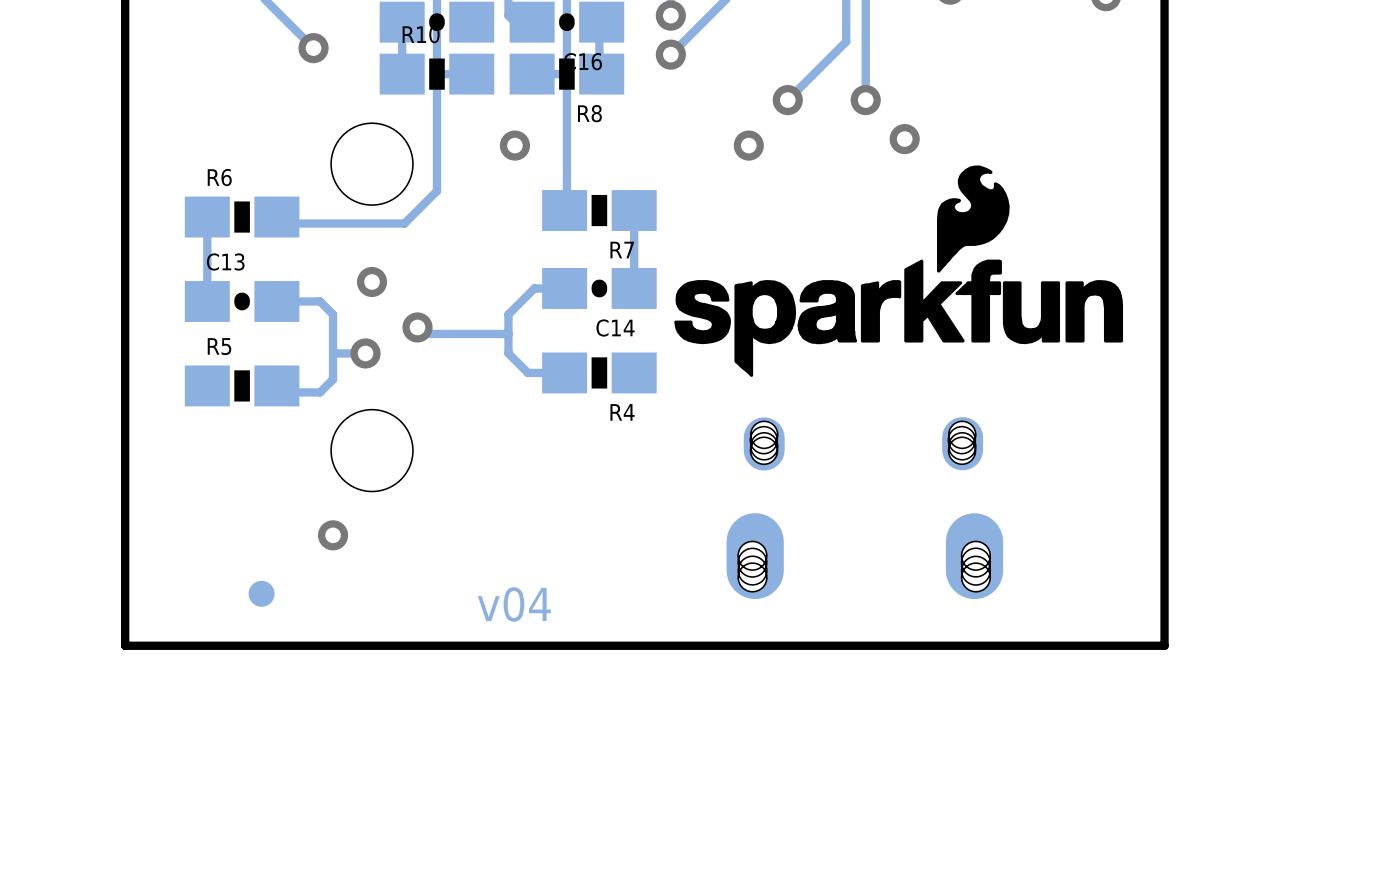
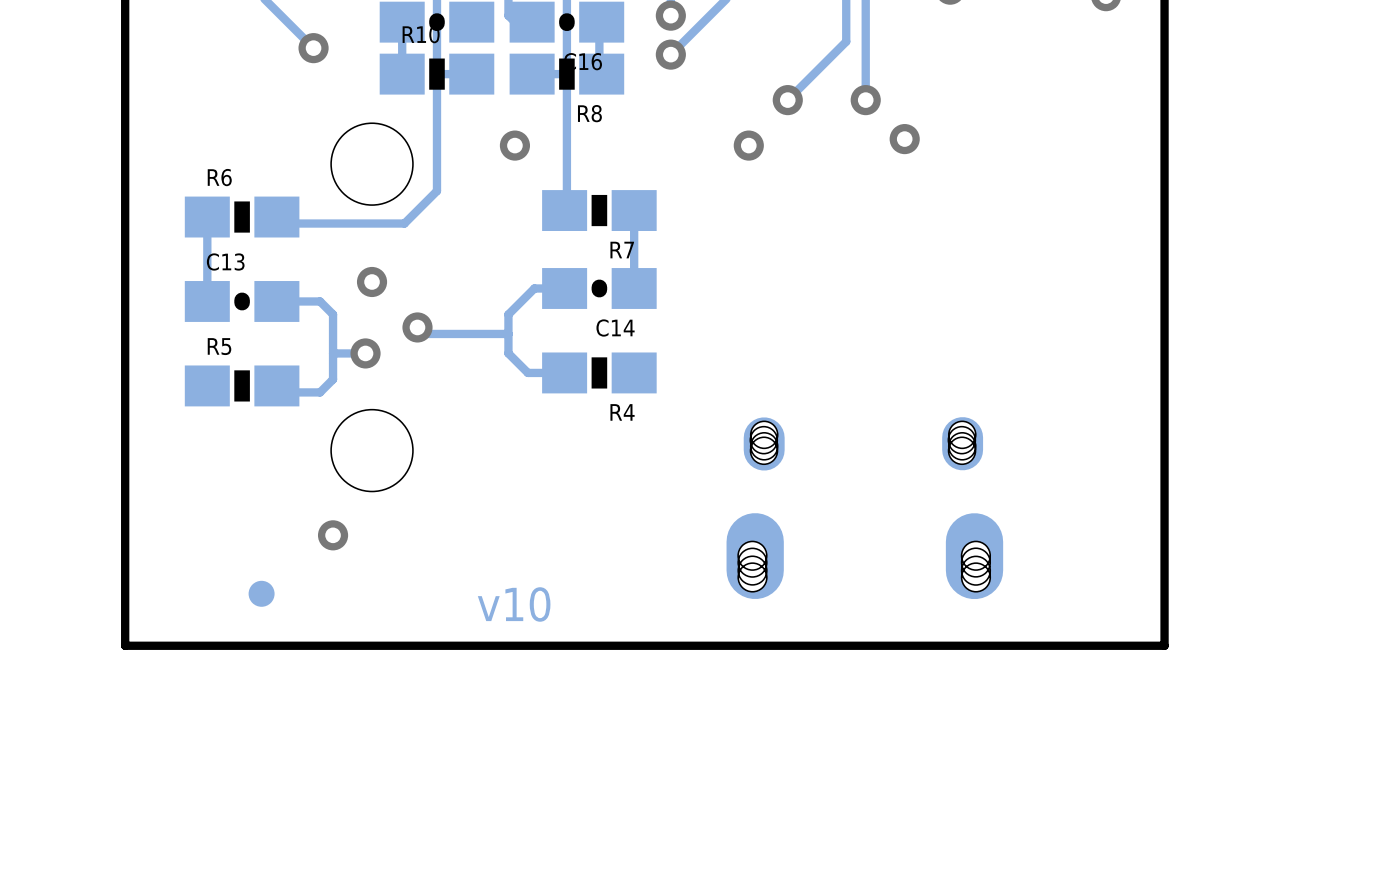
drawing: [674, 165, 1124, 377] -> none
text: v04 (514, 604) -> v10 (514, 604)

